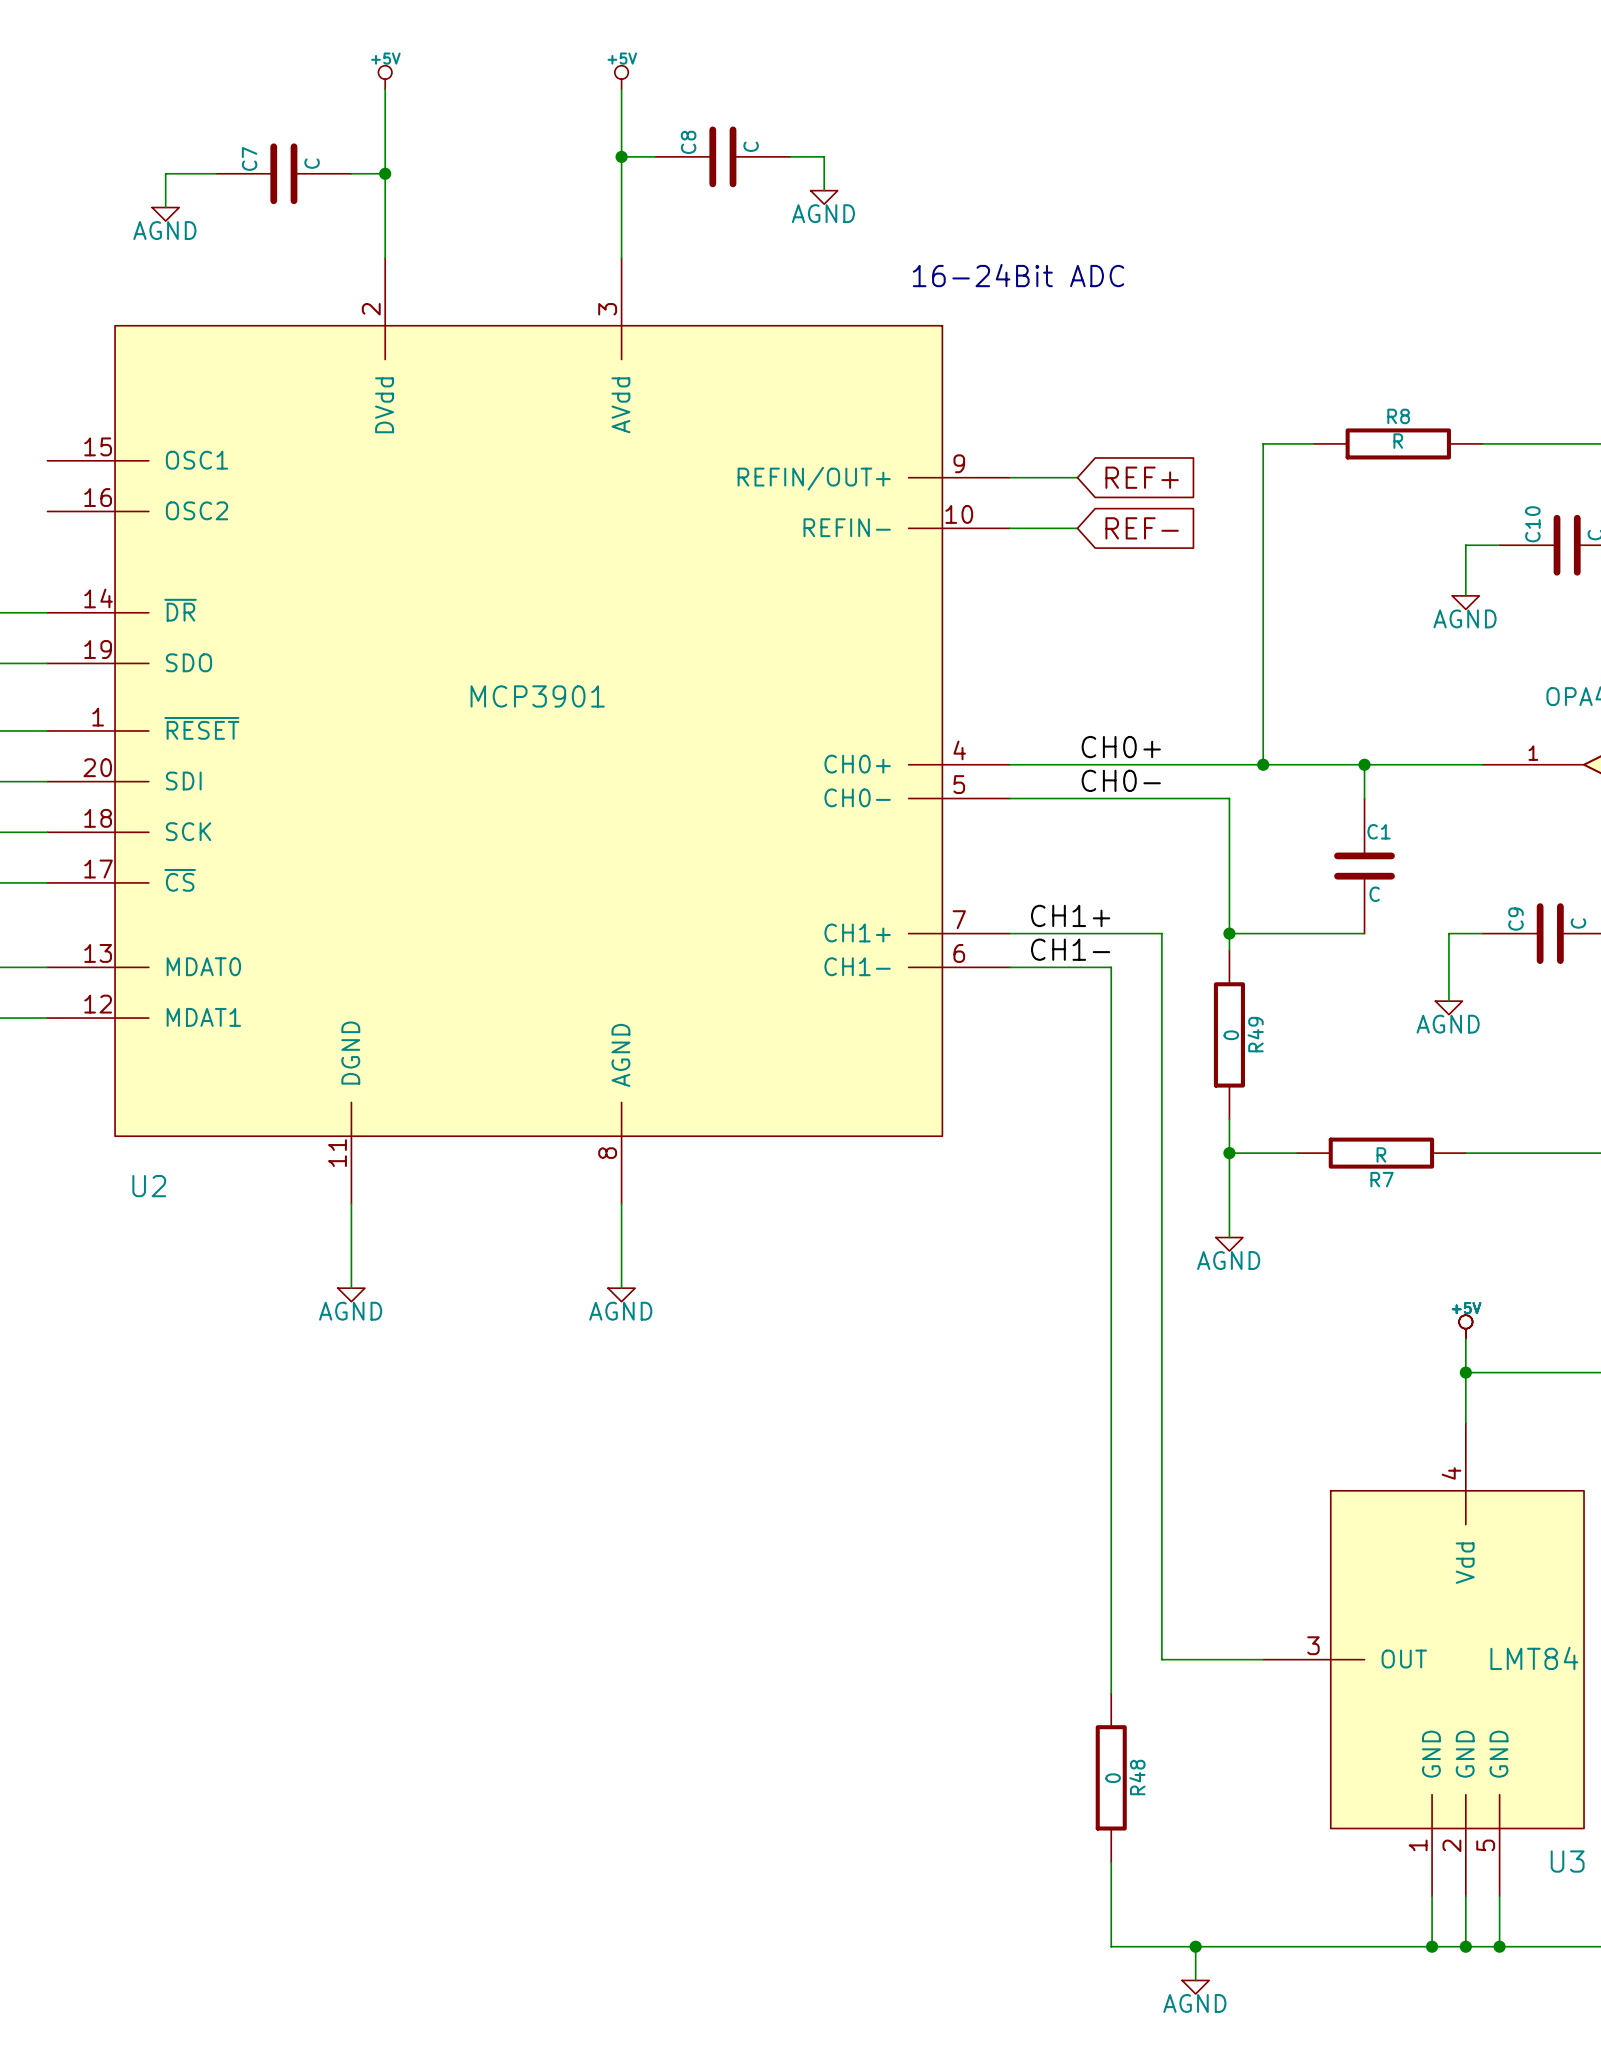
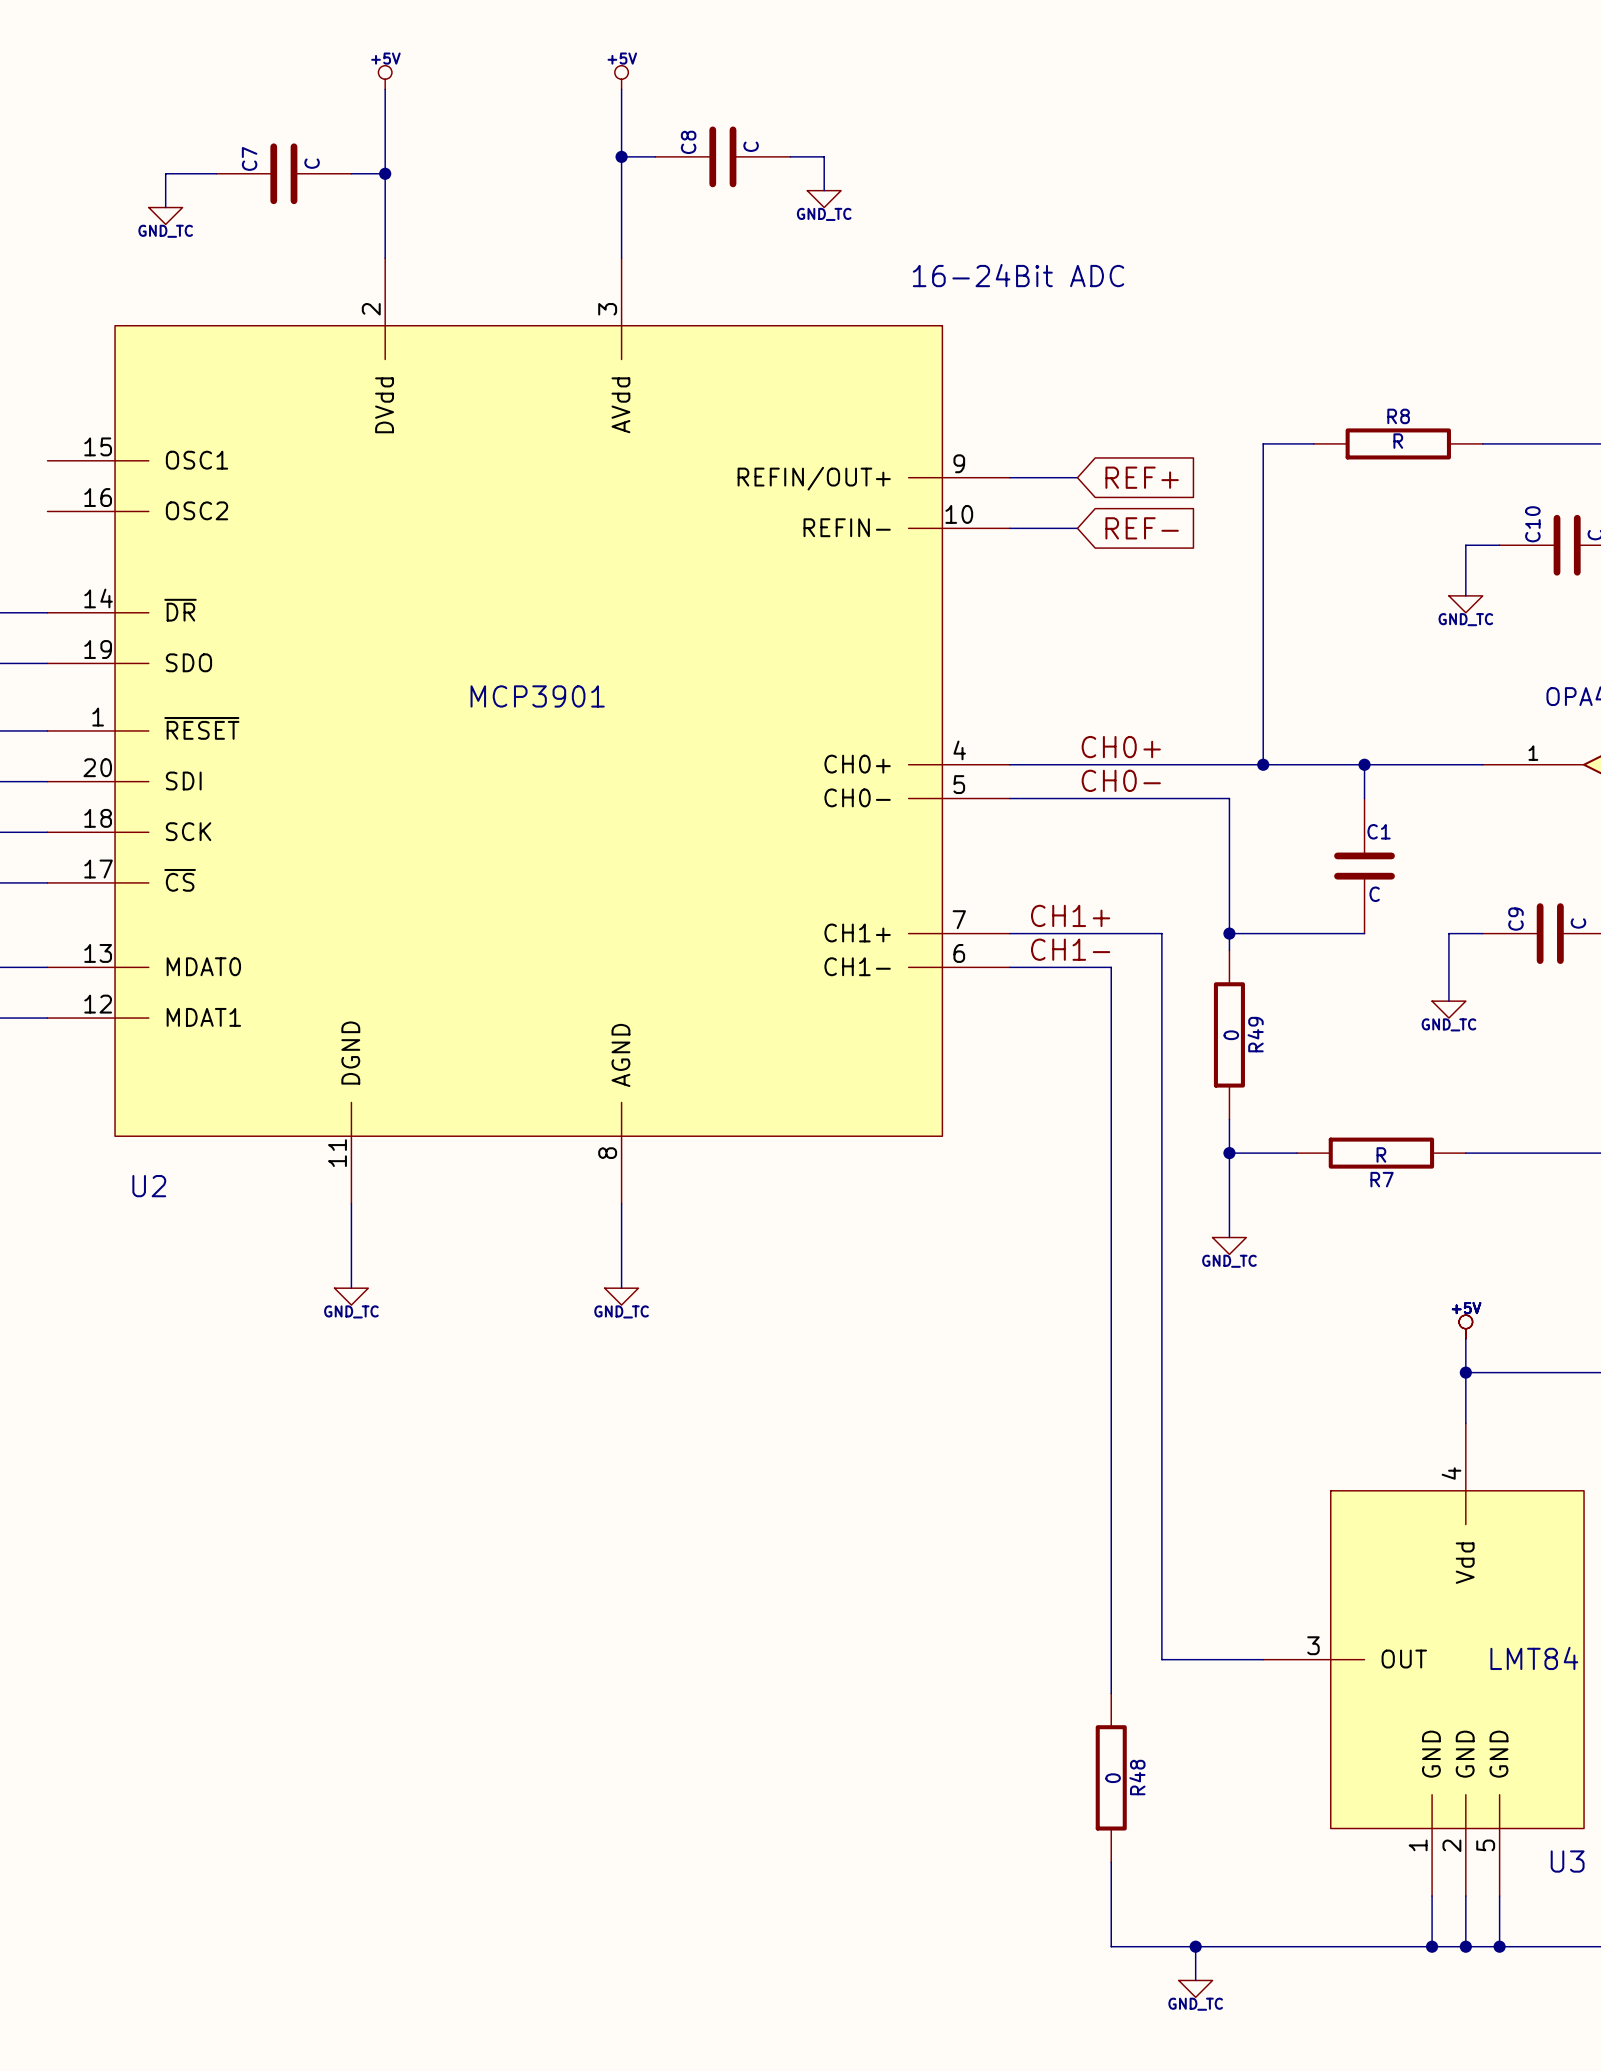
power symbol: AGND (824, 197) -> GND_TC (824, 199)
power symbol: AGND (165, 214) -> GND_TC (165, 215)
power symbol: AGND (1465, 602) -> GND_TC (1465, 604)
power symbol: AGND (1448, 1007) -> GND_TC (1448, 1009)
power symbol: AGND (1229, 1244) -> GND_TC (1229, 1245)
power symbol: AGND (351, 1294) -> GND_TC (351, 1296)
power symbol: AGND (621, 1294) -> GND_TC (621, 1296)
power symbol: AGND (1195, 1987) -> GND_TC (1195, 1988)

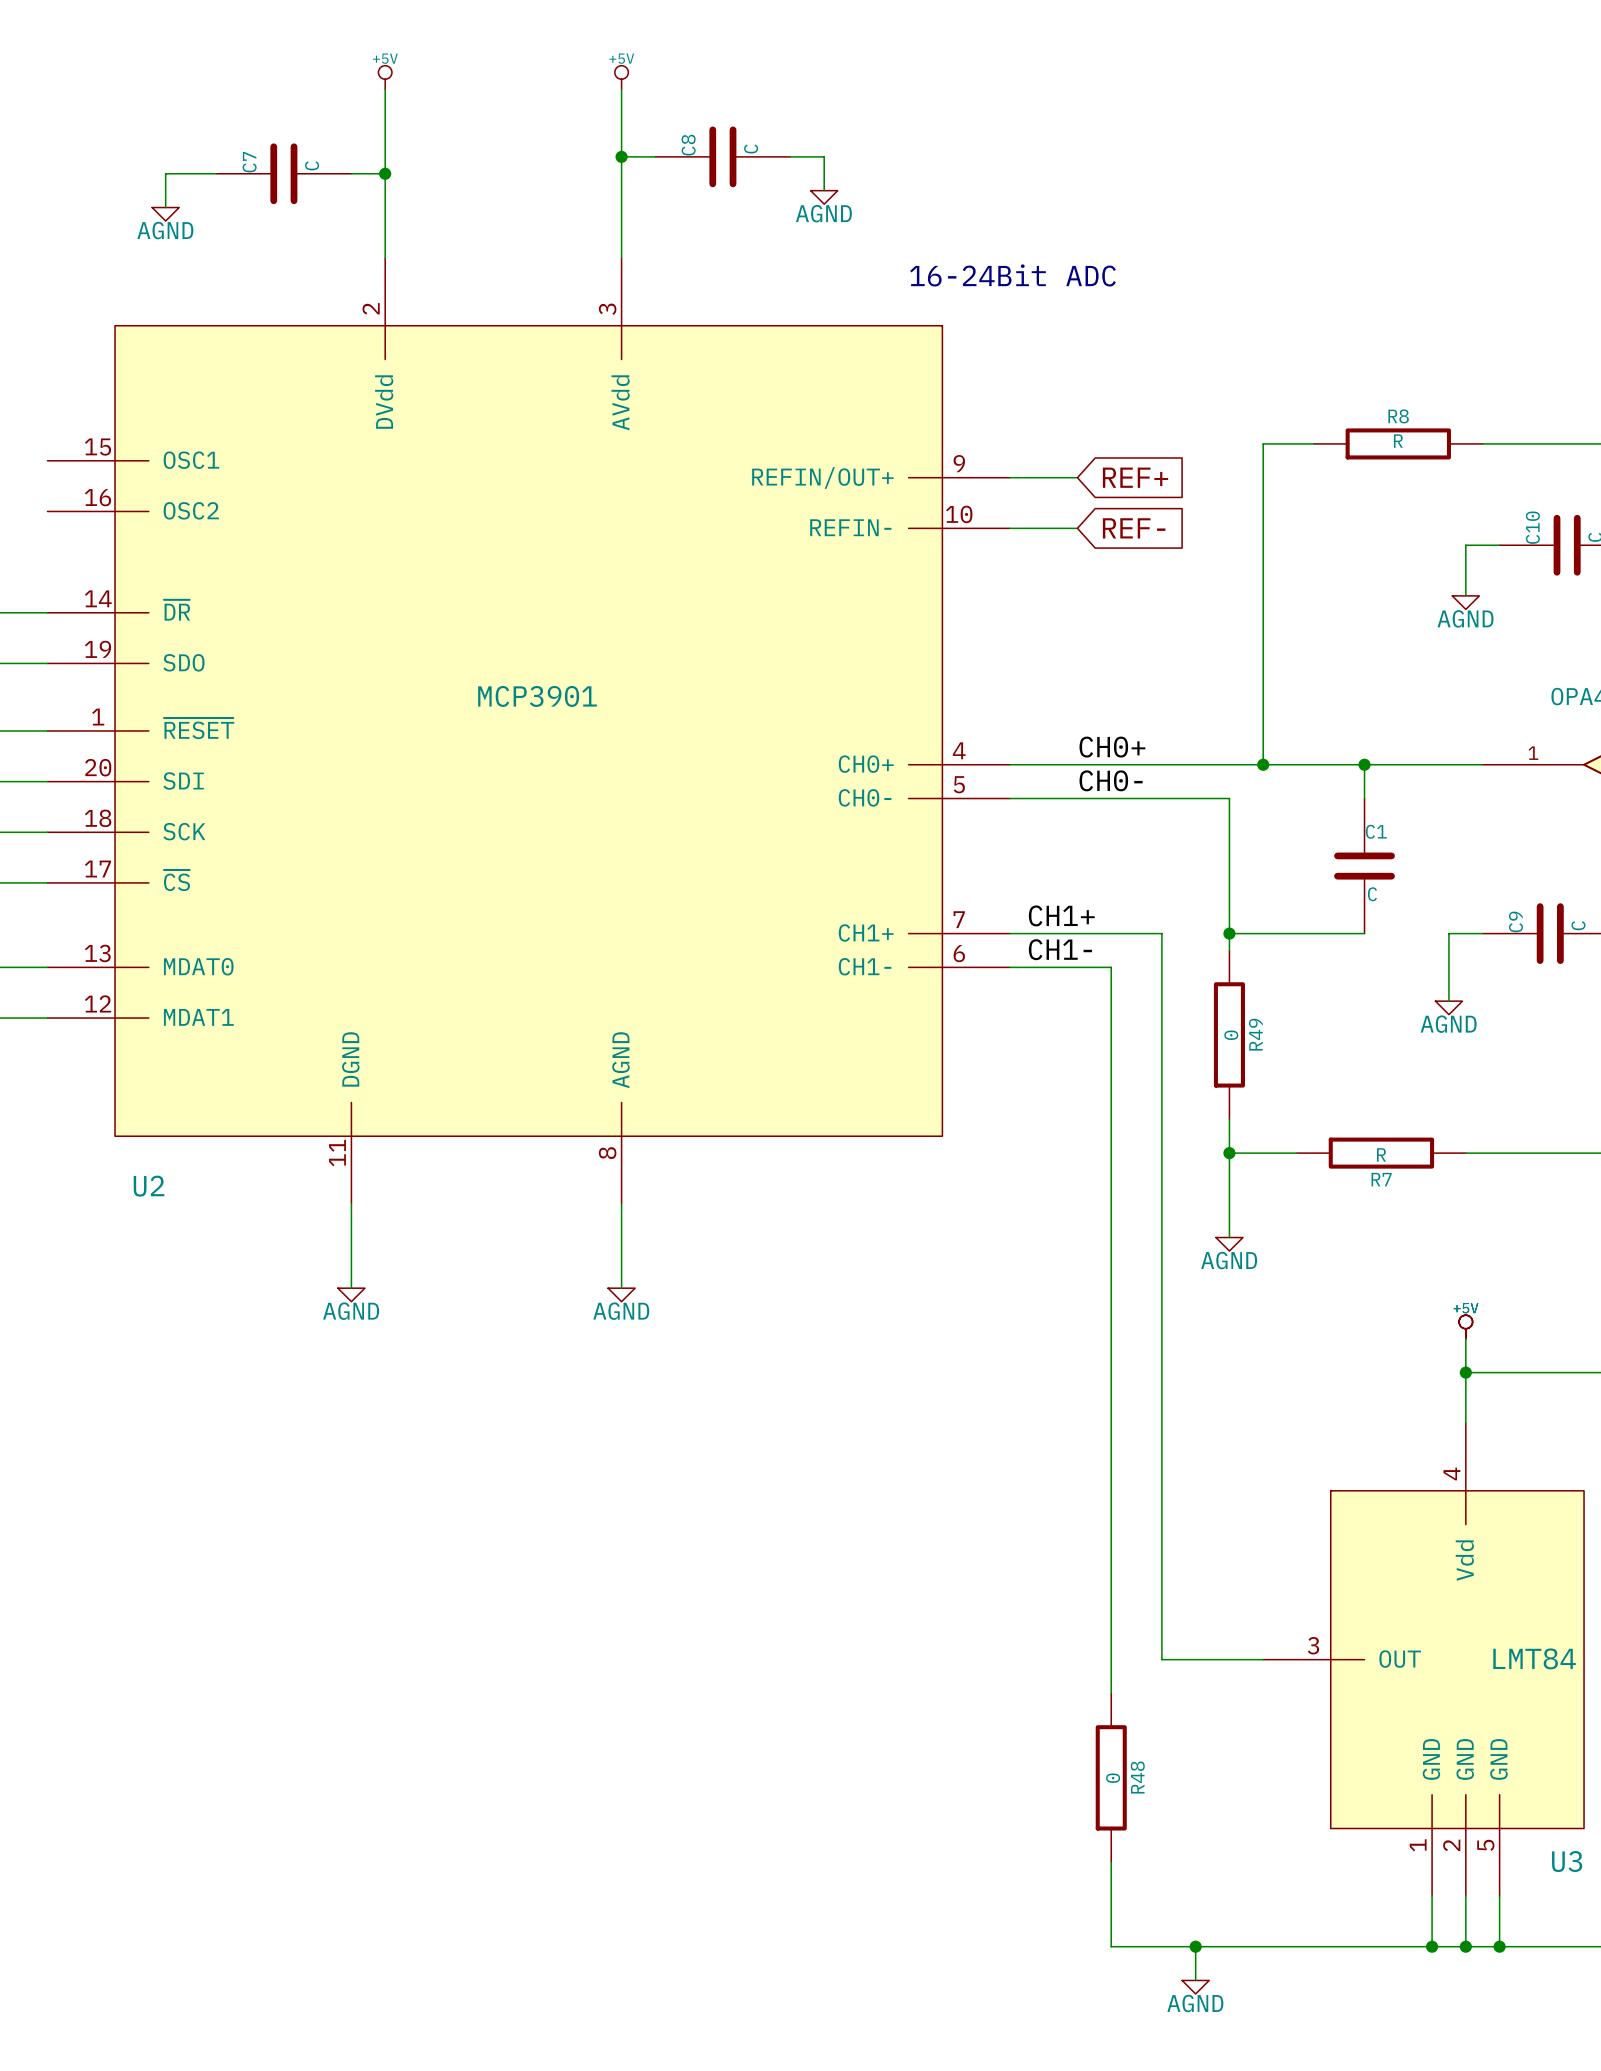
power symbol: GND_TC (824, 199) -> AGND (824, 197)
power symbol: GND_TC (165, 215) -> AGND (165, 214)
power symbol: GND_TC (1465, 604) -> AGND (1465, 602)
power symbol: GND_TC (1448, 1009) -> AGND (1448, 1007)
power symbol: GND_TC (1229, 1245) -> AGND (1229, 1244)
power symbol: GND_TC (351, 1296) -> AGND (351, 1294)
power symbol: GND_TC (621, 1296) -> AGND (621, 1294)
power symbol: GND_TC (1195, 1988) -> AGND (1195, 1987)

